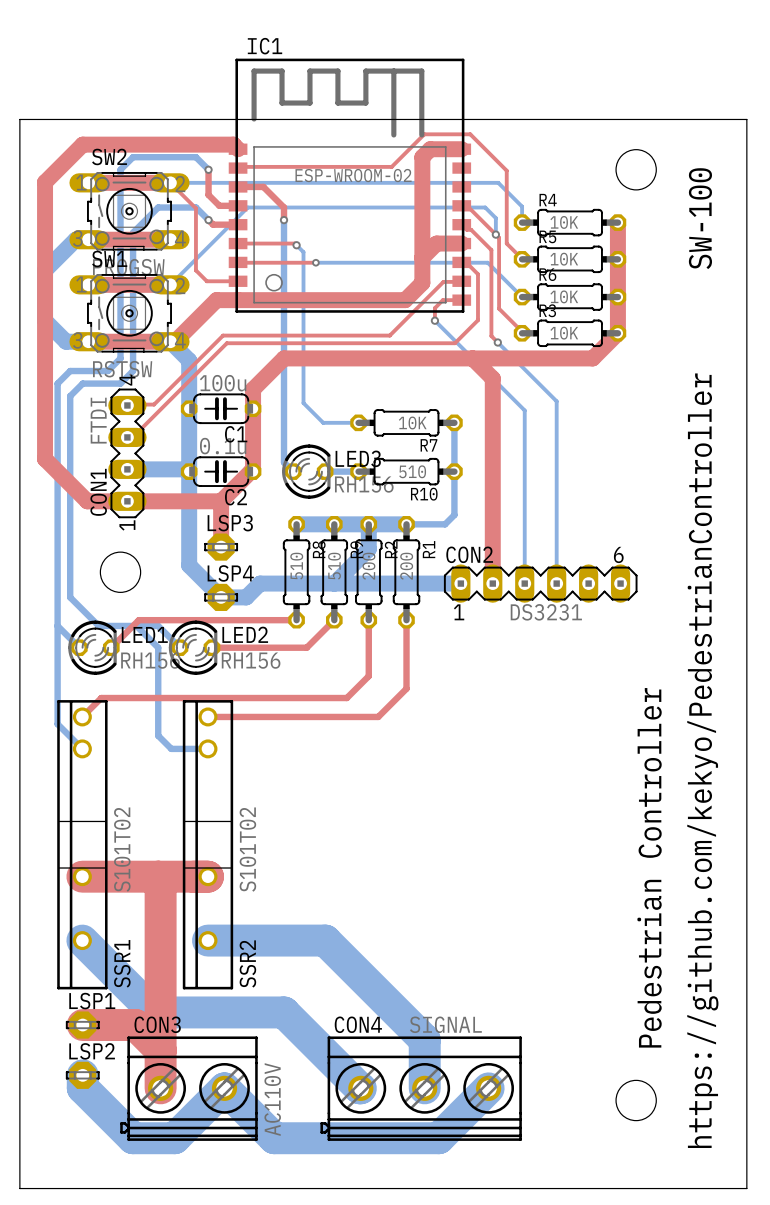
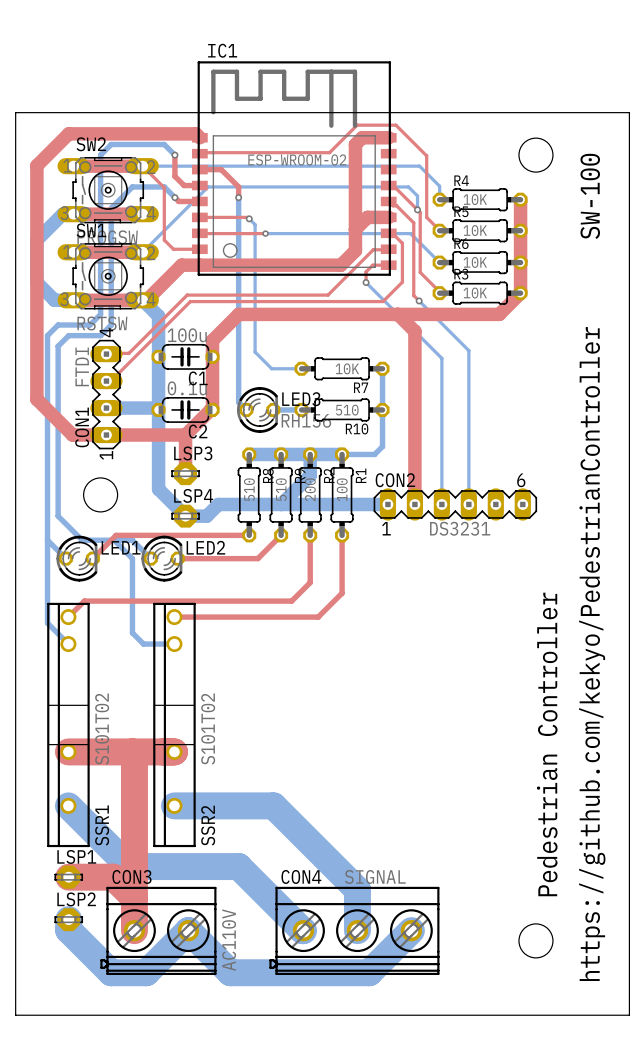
R1 value: 200 (406, 566) -> 100 (342, 489)
LED1 value: RH156 (150, 660) -> none
LED2 value: RH156 (251, 660) -> none

